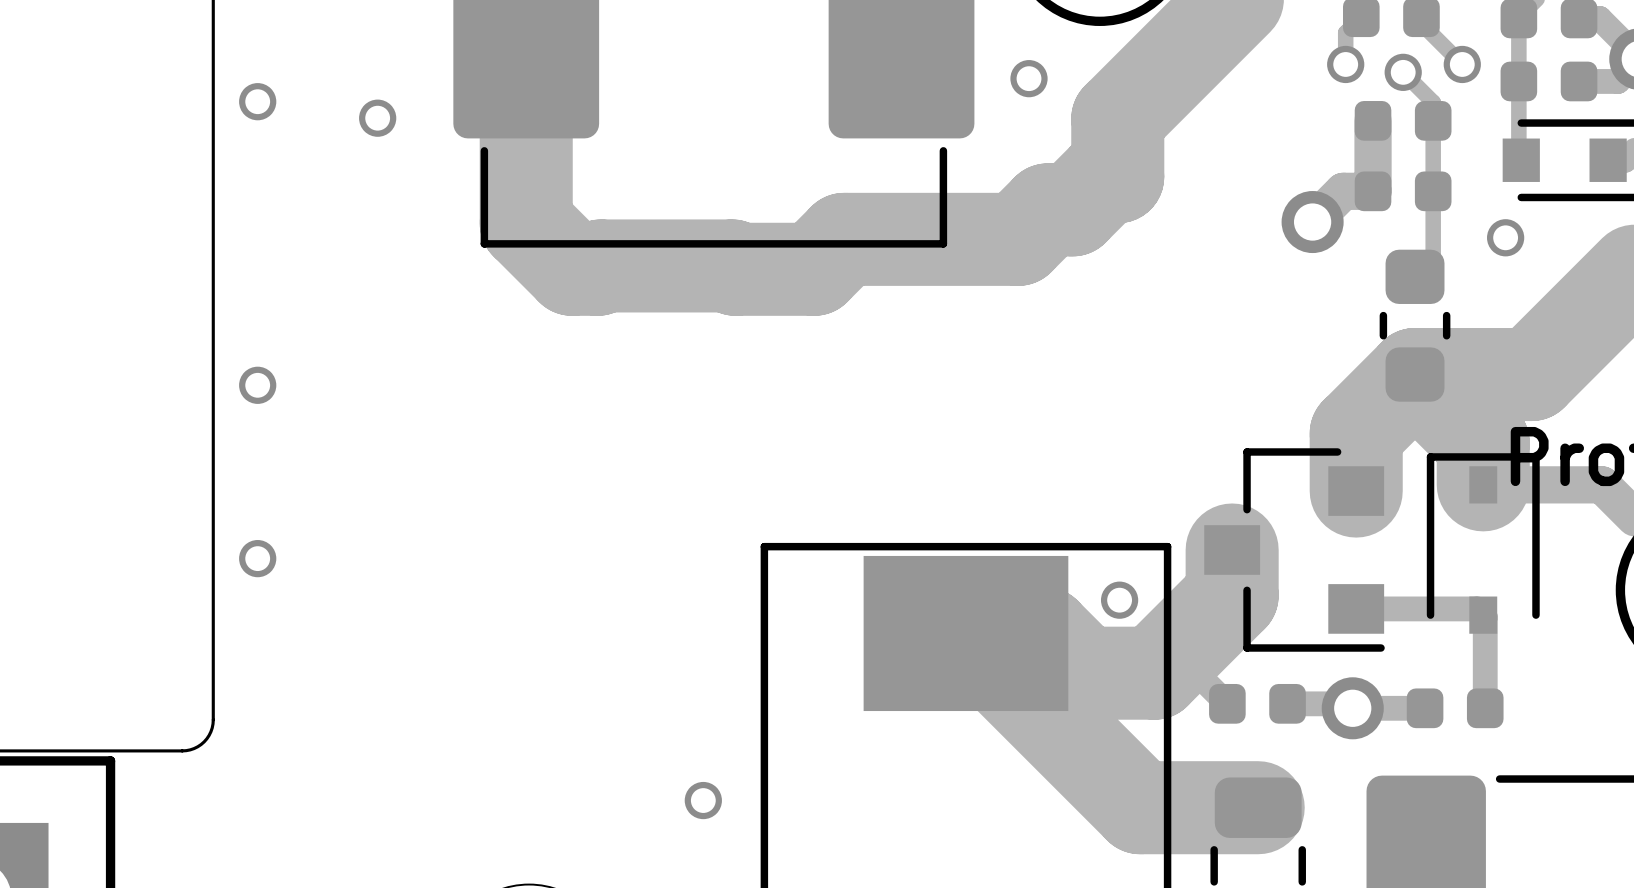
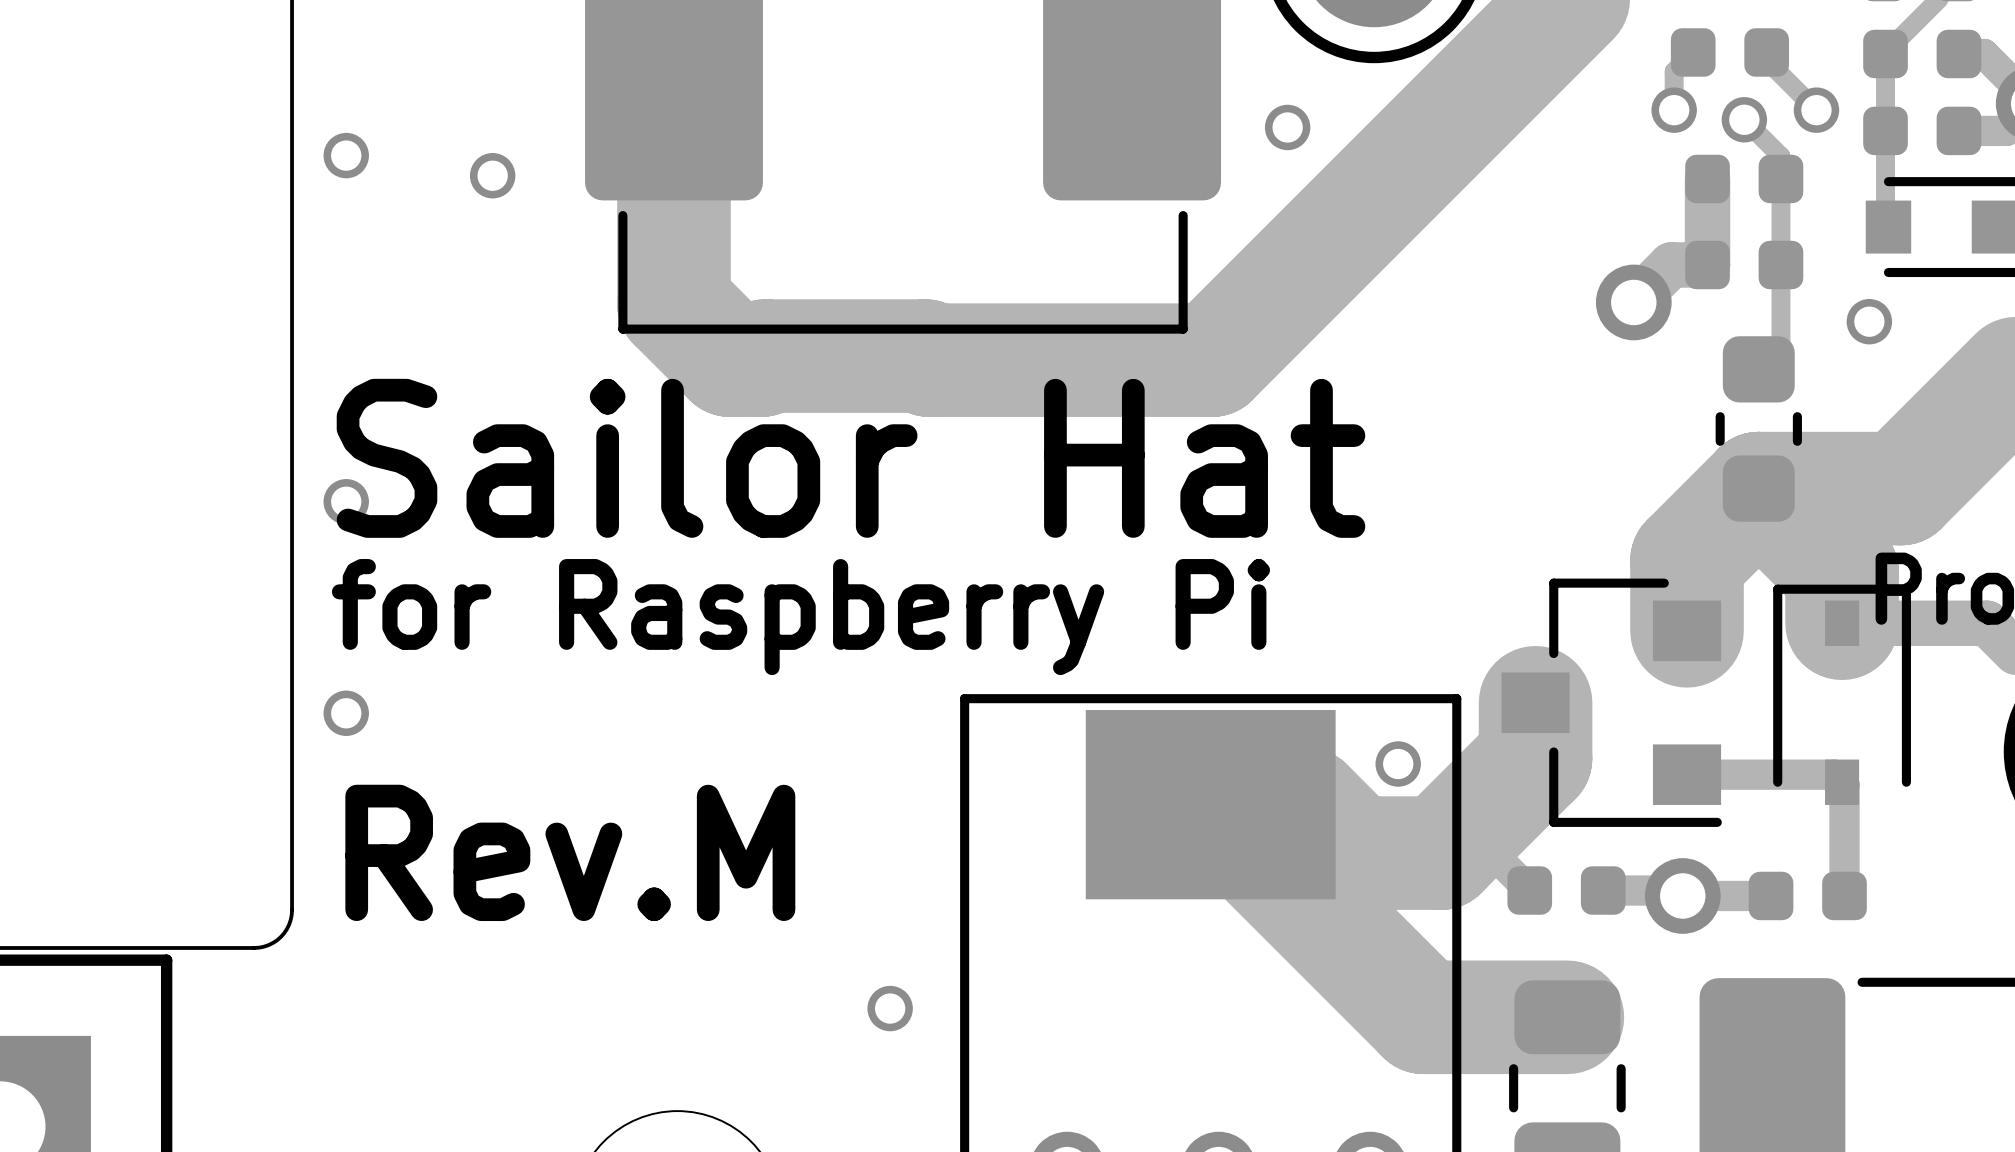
track: (1117, 118) (1117, 176) (1105, 176) (1072, 209) (1047, 209) (1018, 239) (844, 239) (814, 269) -> (1395, 176) (1212, 360) (1025, 360)
text: none -> Sailor Hat (851, 458)
text: none -> for Raspberry Pi (800, 617)
text: none -> Rev.M (570, 852)

